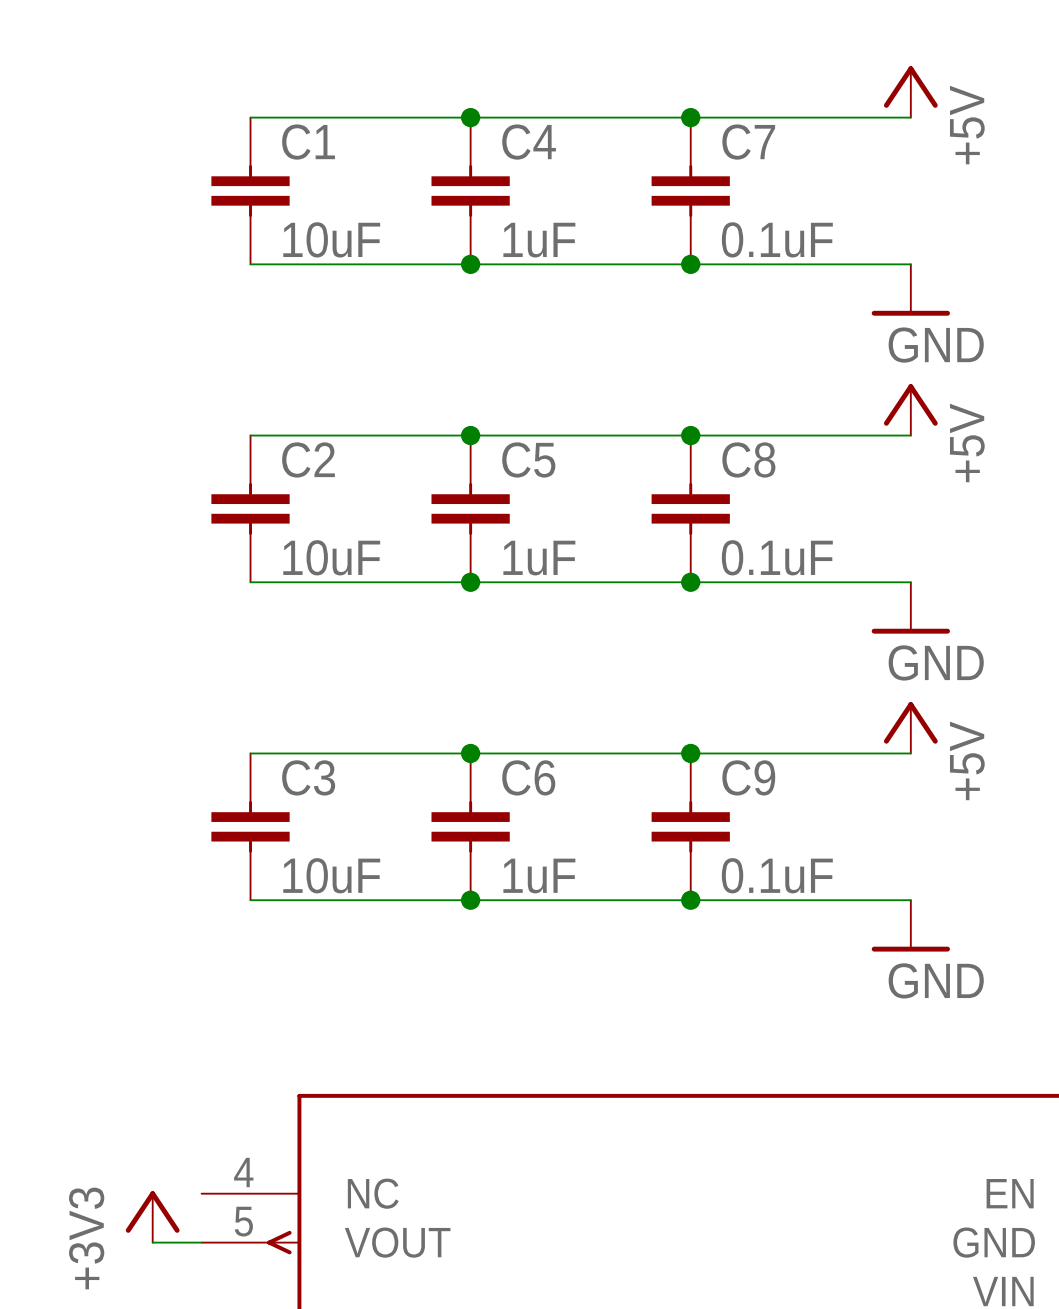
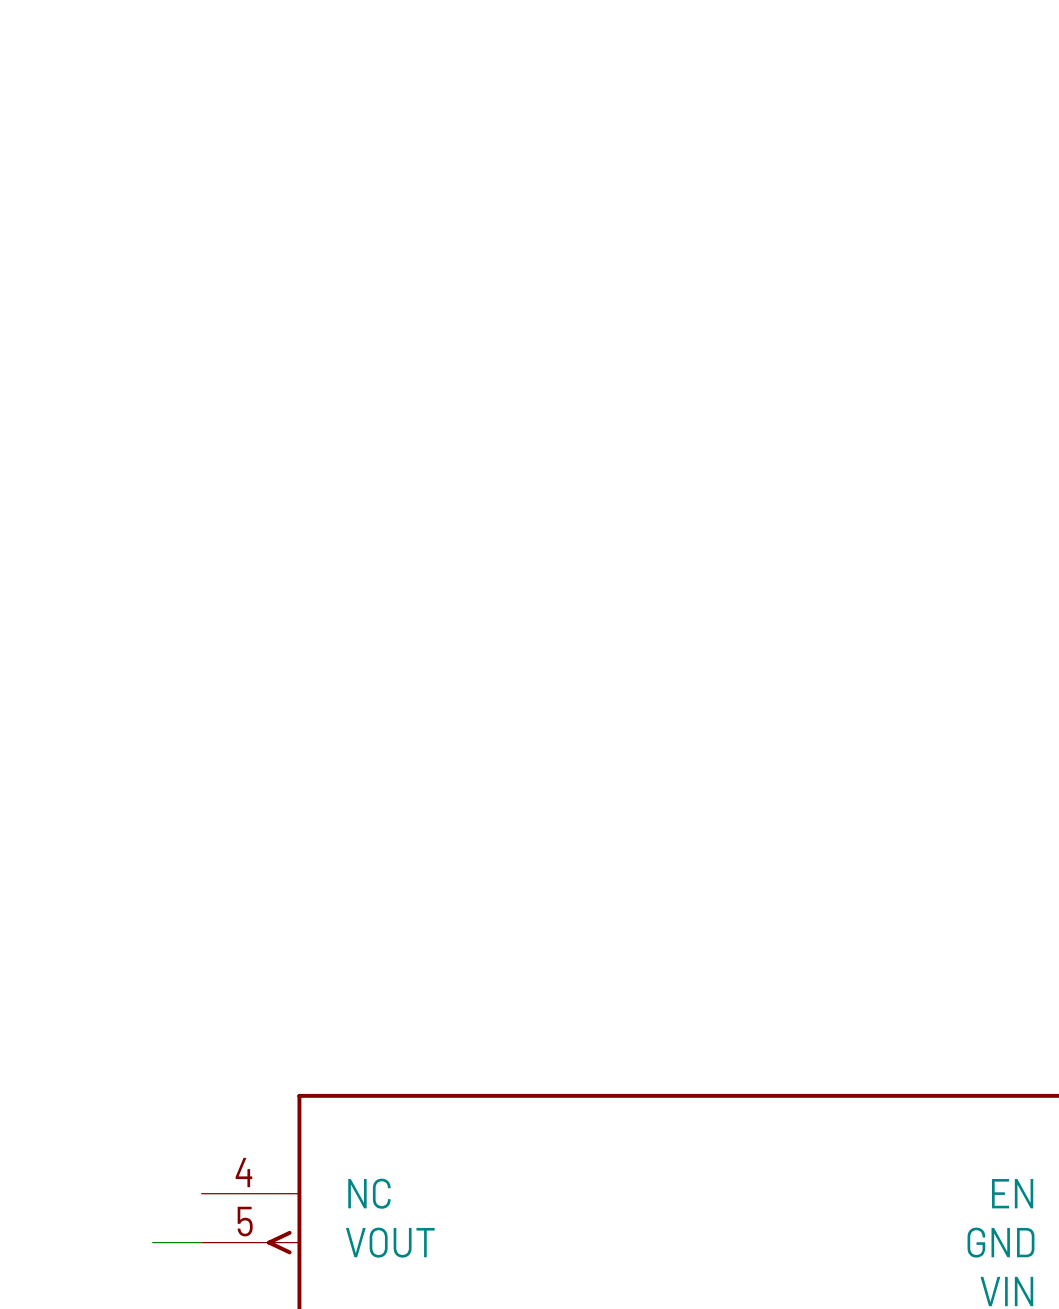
power symbol: +5V (910, 91) -> none
wire: (250, 117) (910, 117) -> none
junction: (470, 117) -> none
junction: (690, 117) -> none
C1: 10uF (250, 190) -> none
C4: 1uF (470, 190) -> none
C7: 0.1uF (690, 190) -> none
wire: (250, 264) (910, 264) -> none
junction: (470, 264) -> none
junction: (690, 264) -> none
power symbol: GND (910, 290) -> none
power symbol: +5V (910, 409) -> none
wire: (250, 435) (910, 435) -> none
junction: (470, 435) -> none
junction: (690, 435) -> none
C2: 10uF (250, 508) -> none
C5: 1uF (470, 508) -> none
C8: 0.1uF (690, 508) -> none
wire: (250, 582) (910, 582) -> none
junction: (470, 582) -> none
junction: (690, 582) -> none
power symbol: GND (910, 607) -> none
power symbol: +5V (910, 727) -> none
wire: (250, 753) (910, 753) -> none
junction: (470, 753) -> none
junction: (690, 753) -> none
C3: 10uF (250, 826) -> none
C6: 1uF (470, 826) -> none
C9: 0.1uF (690, 826) -> none
wire: (250, 900) (910, 900) -> none
junction: (470, 900) -> none
junction: (690, 900) -> none
power symbol: GND (910, 925) -> none
power symbol: +3V3 (152, 1216) -> none

